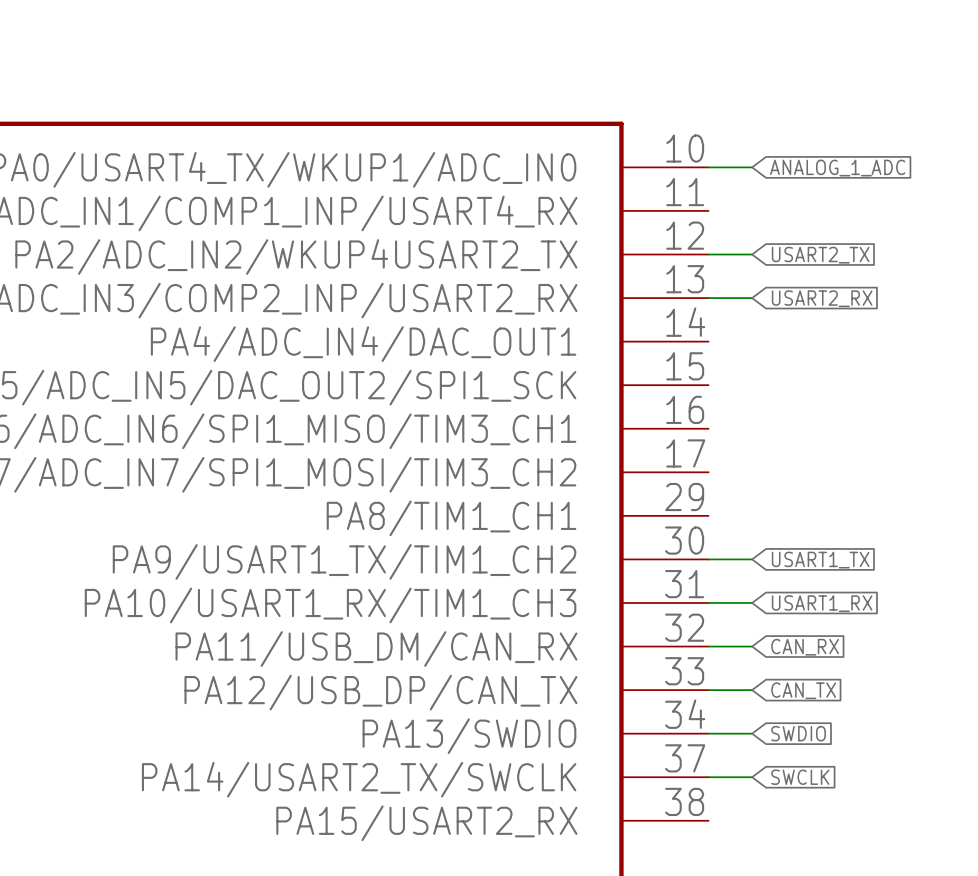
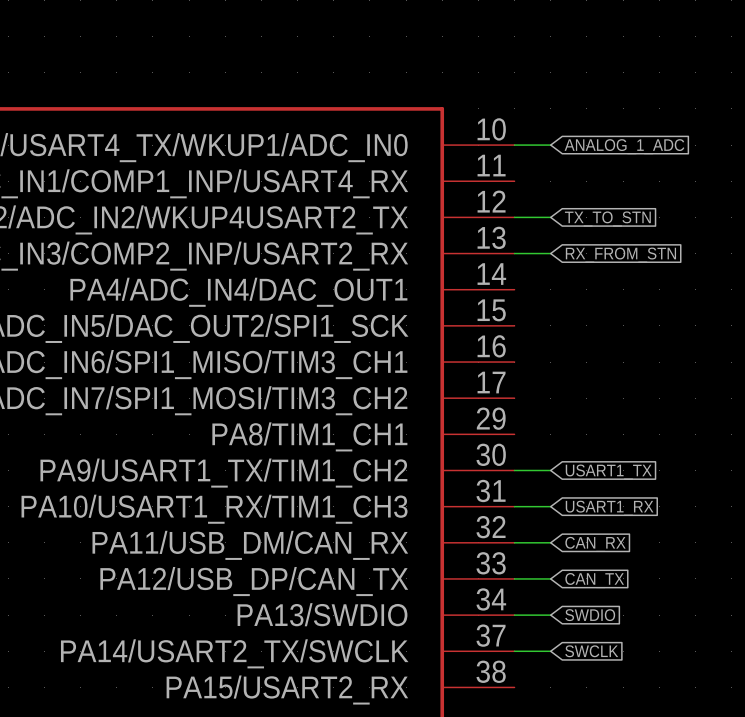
global label: USART2_TX (820, 255) -> TX_TO_STN (607, 218)
global label: USART2_RX (822, 298) -> RX_FROM_STN (620, 255)

